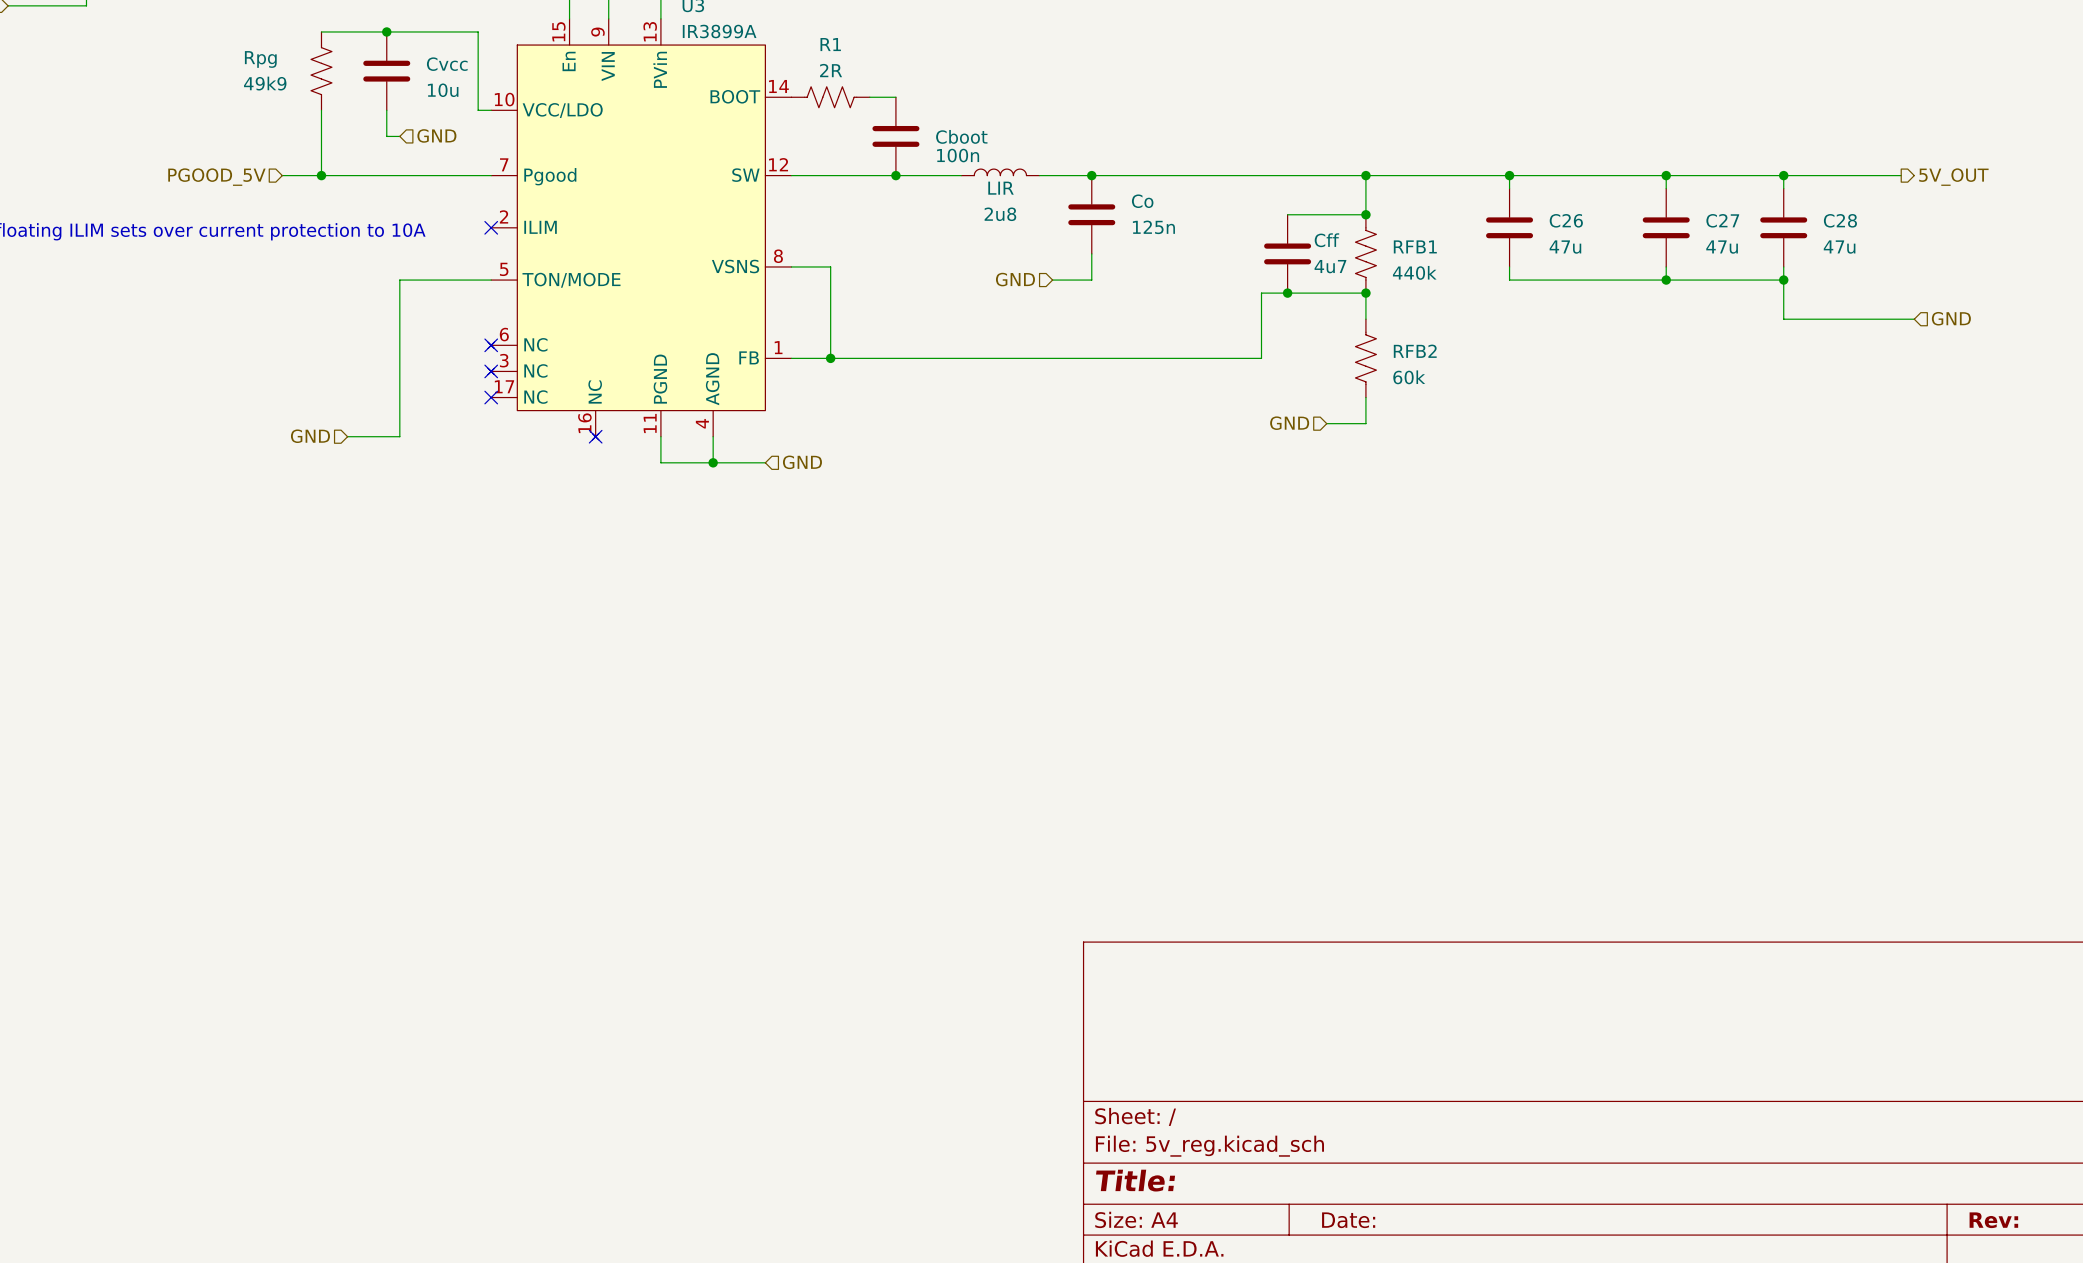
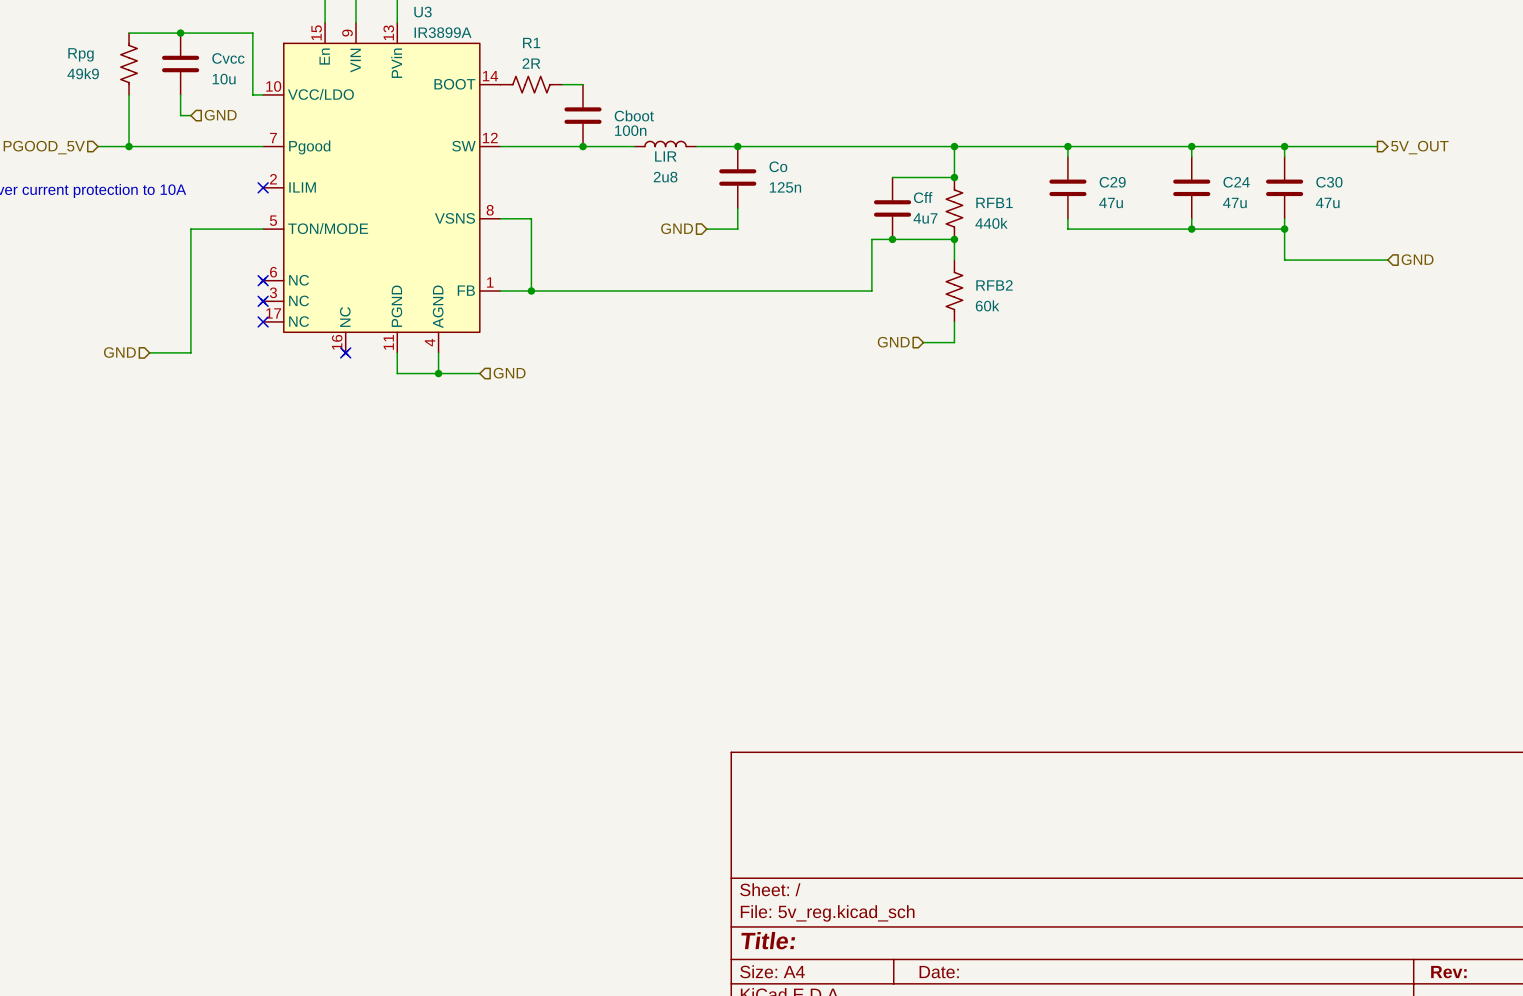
C26 name: C26 (1566, 220) -> C29 (1112, 182)
C27 name: C27 (1722, 220) -> C24 (1236, 182)
C28 name: C28 (1840, 220) -> C30 (1329, 182)

